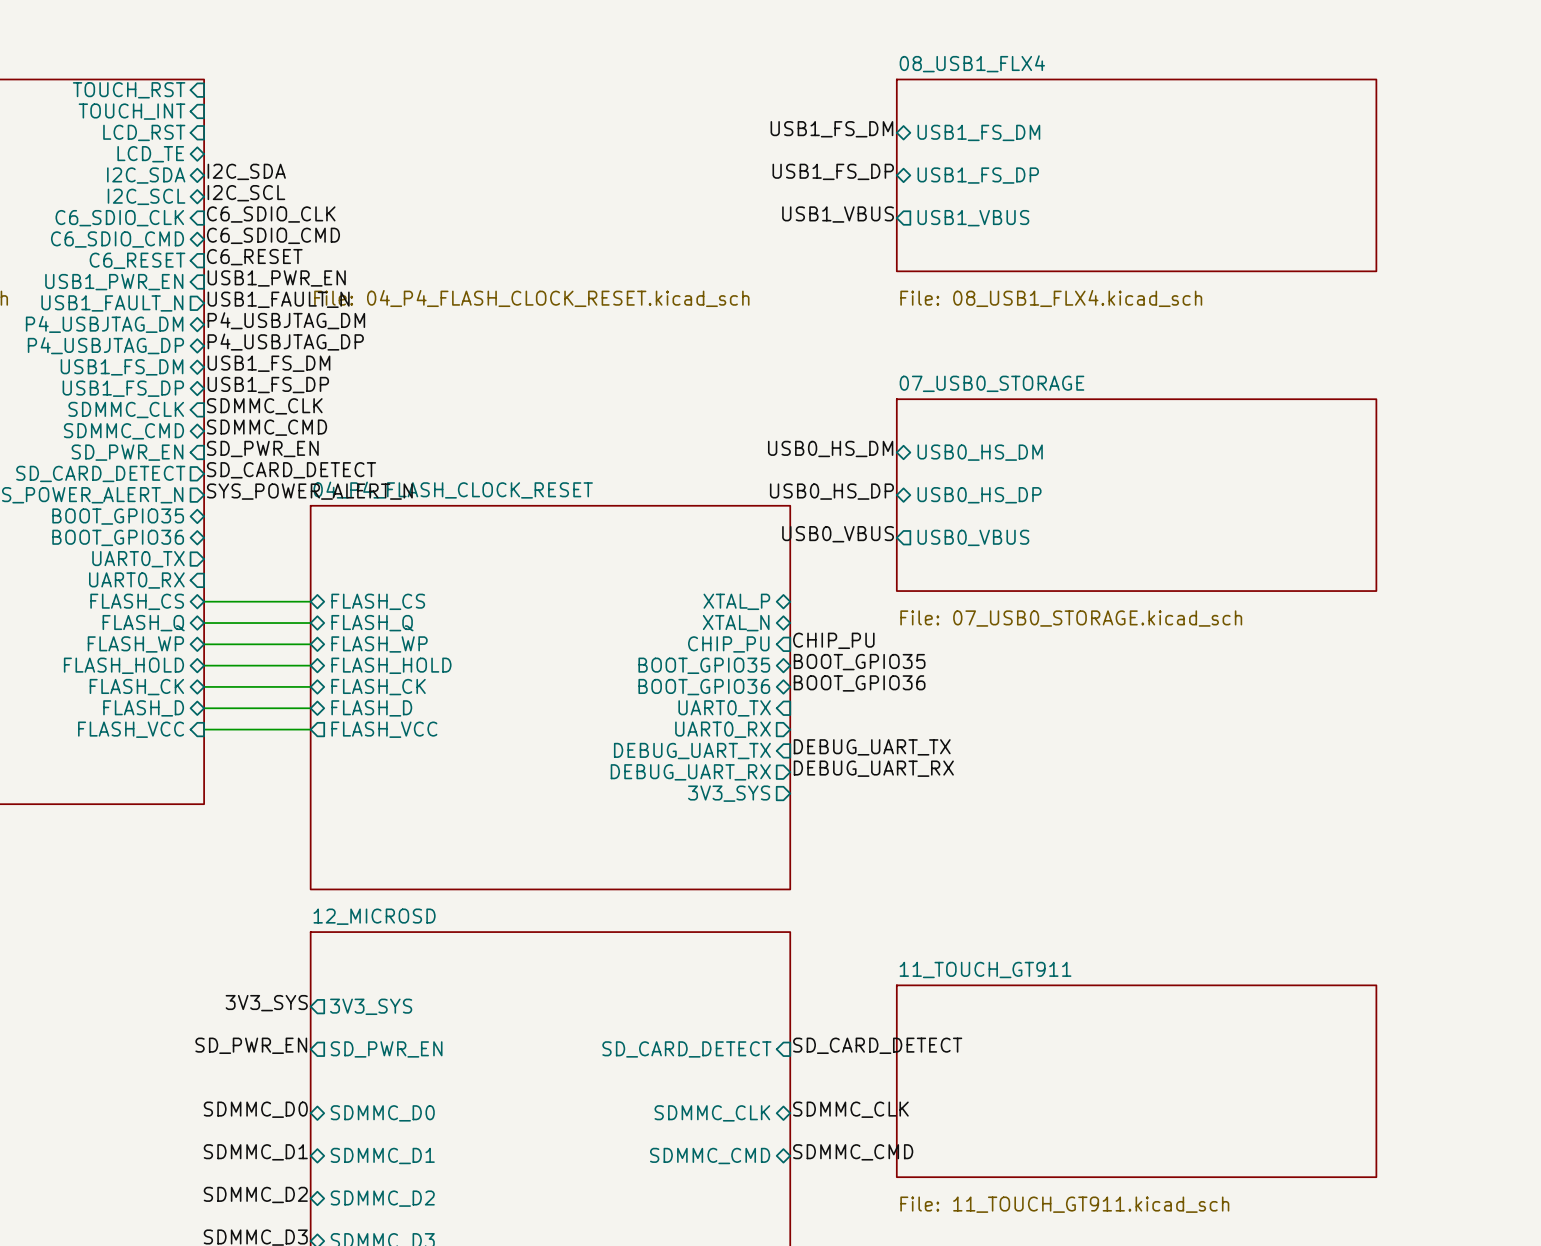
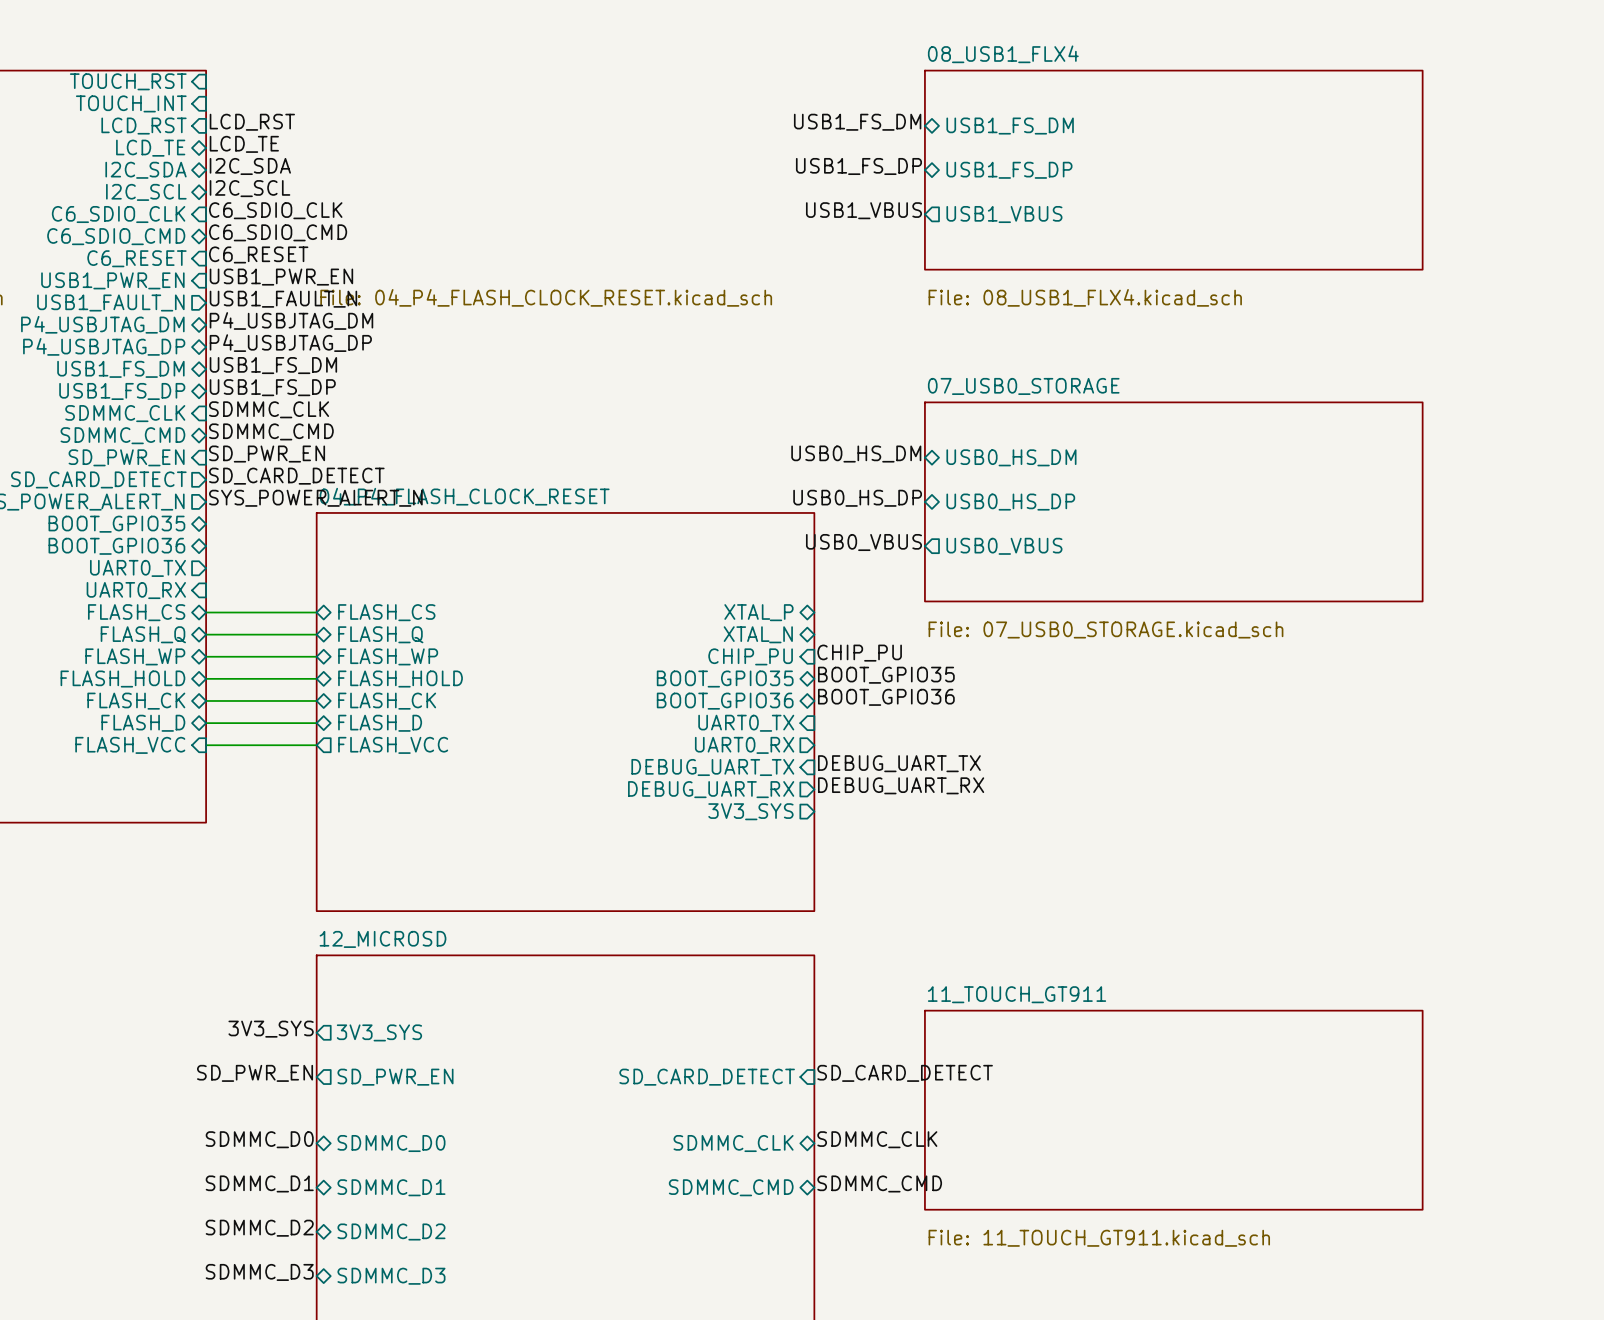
label: none -> LCD_RST (252, 122)
label: none -> LCD_TE (244, 144)

